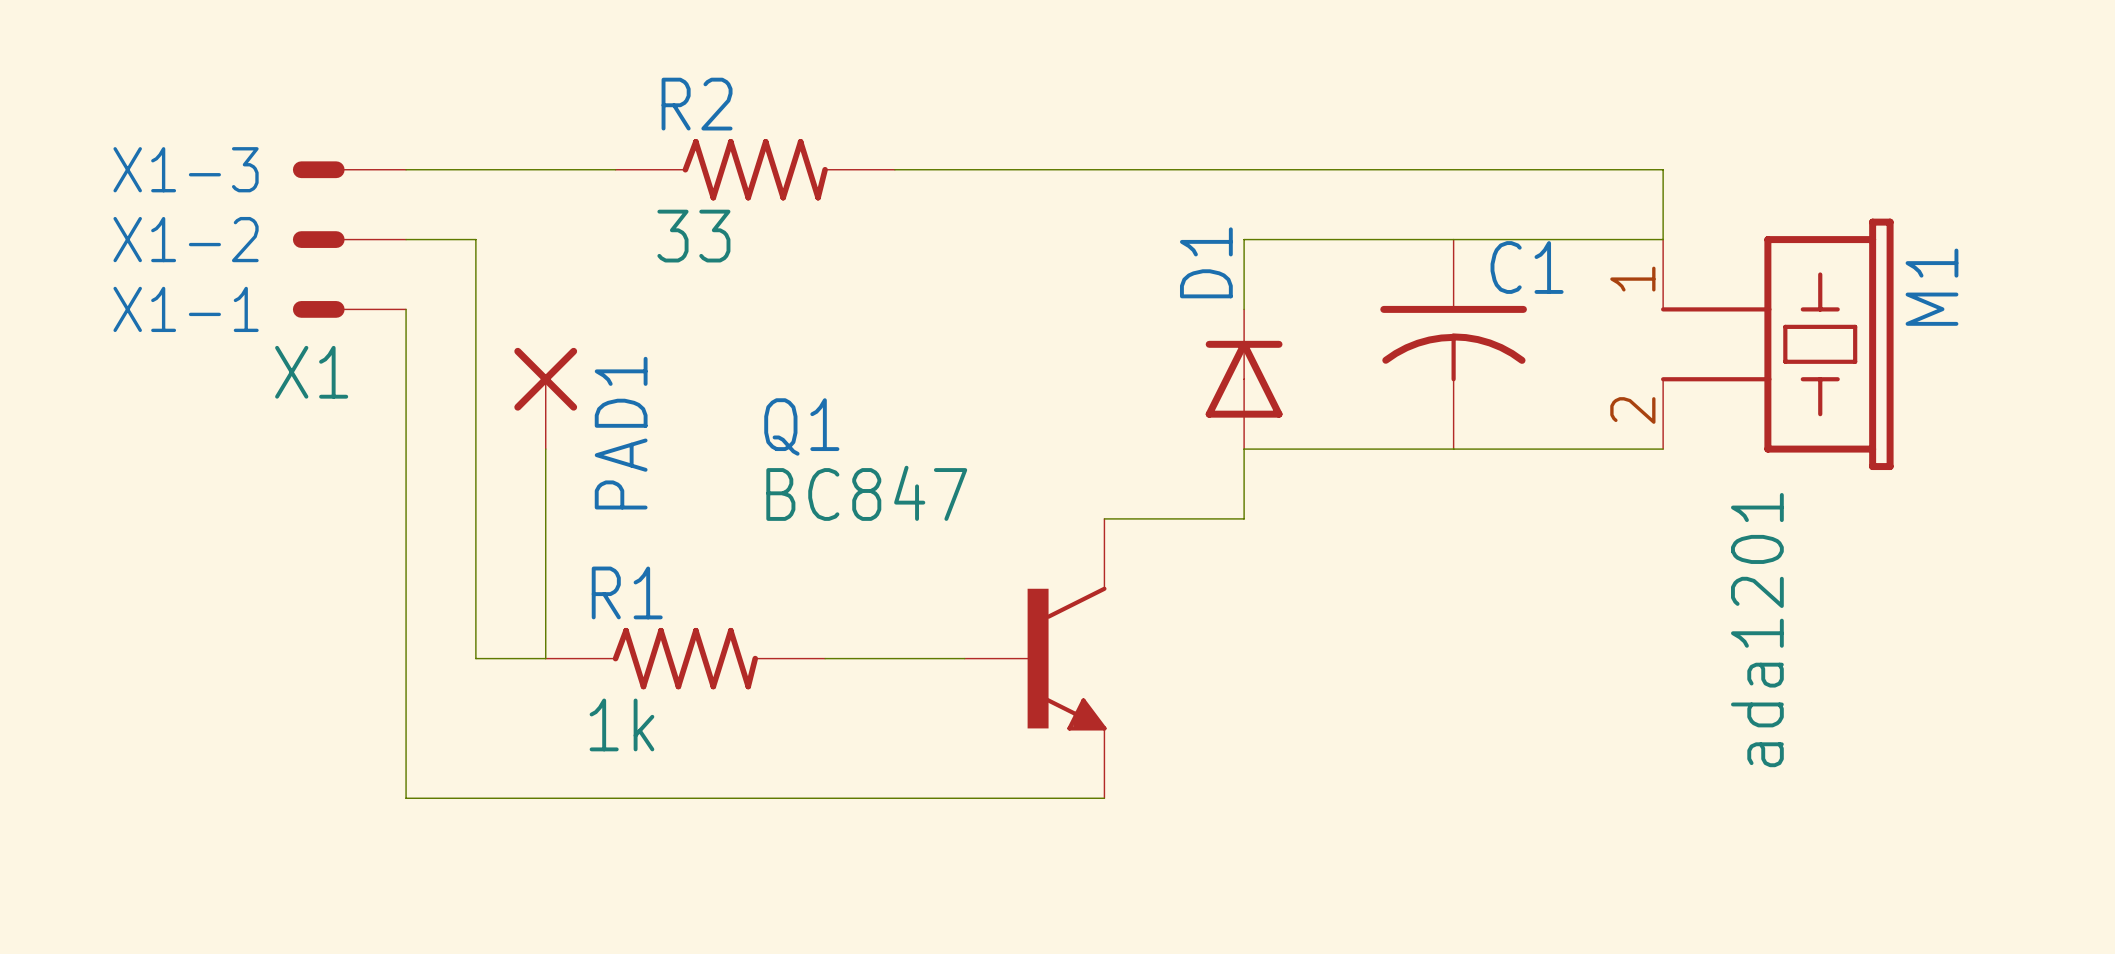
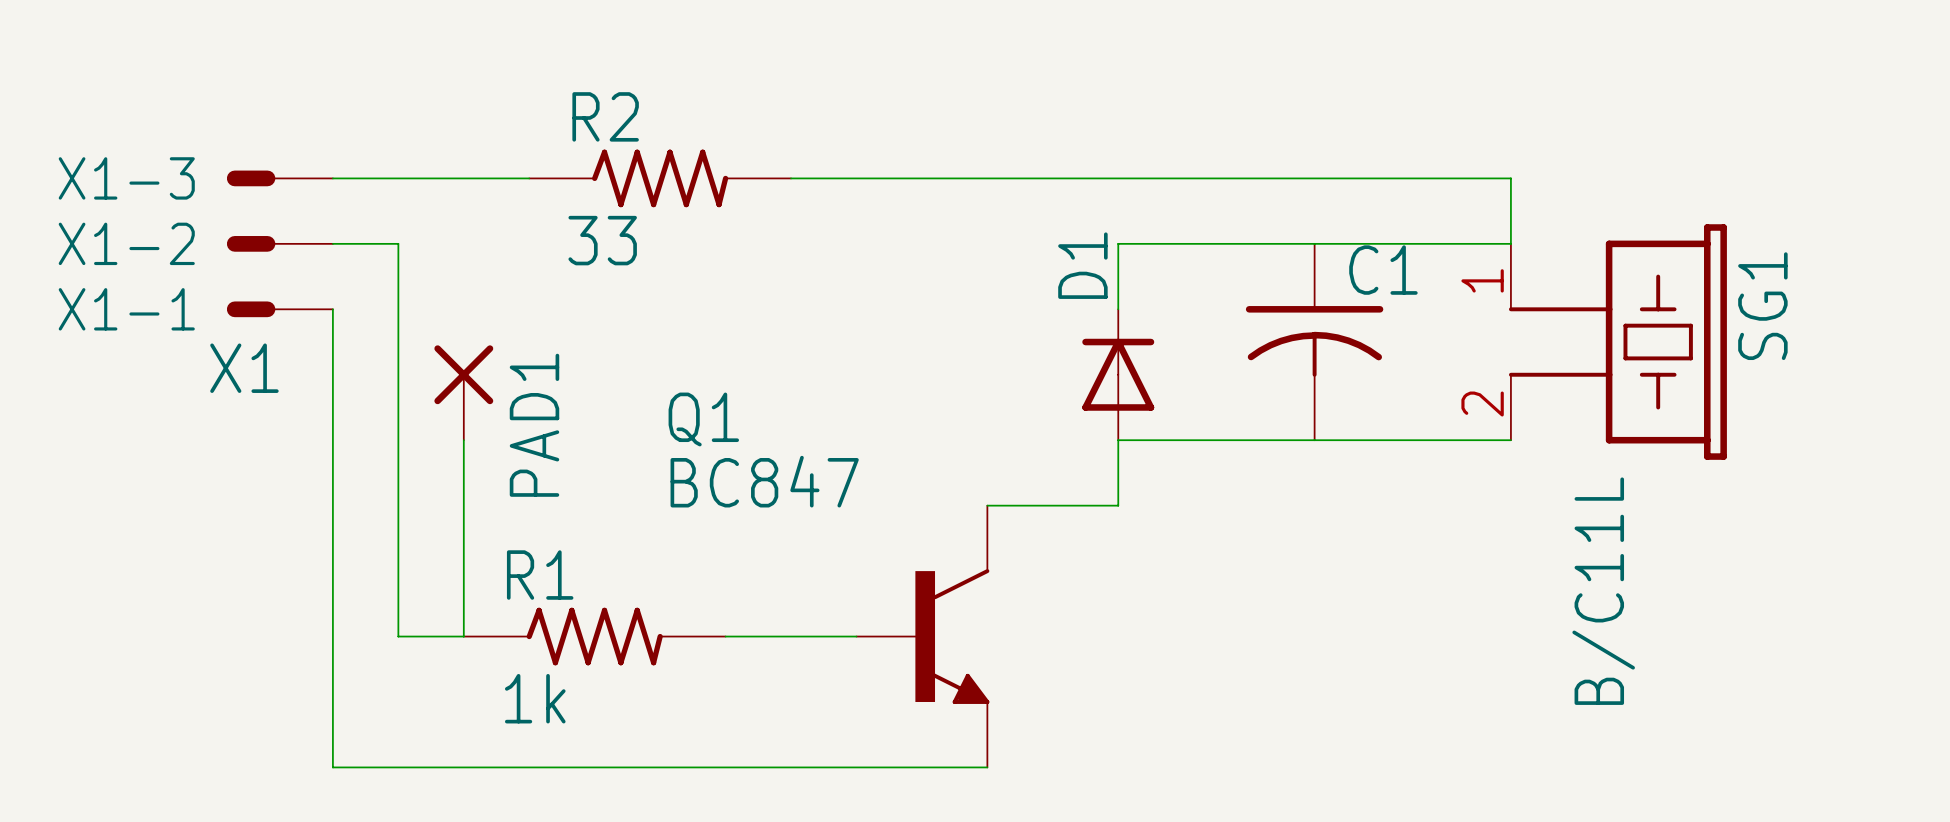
M1 name: M1 (1931, 287) -> SG1 (1762, 306)
M1 value: ada1201 (1757, 630) -> B/C11L (1603, 591)

